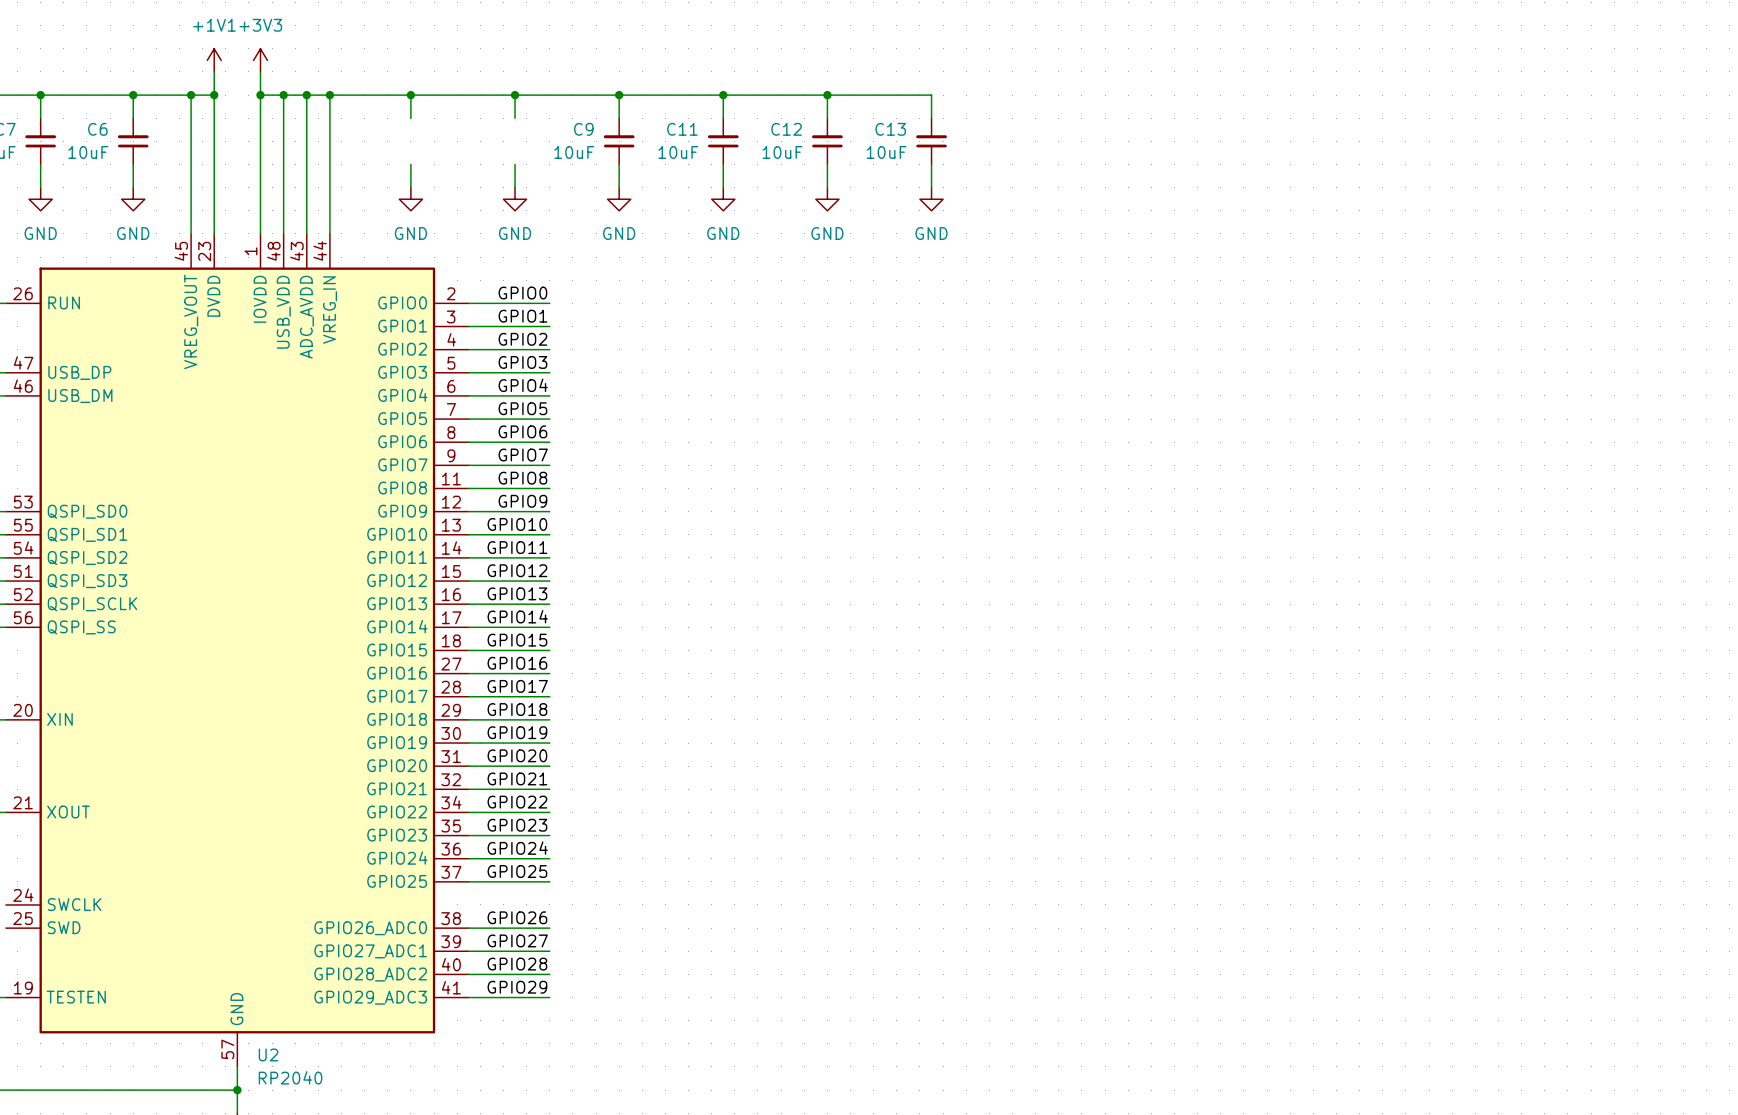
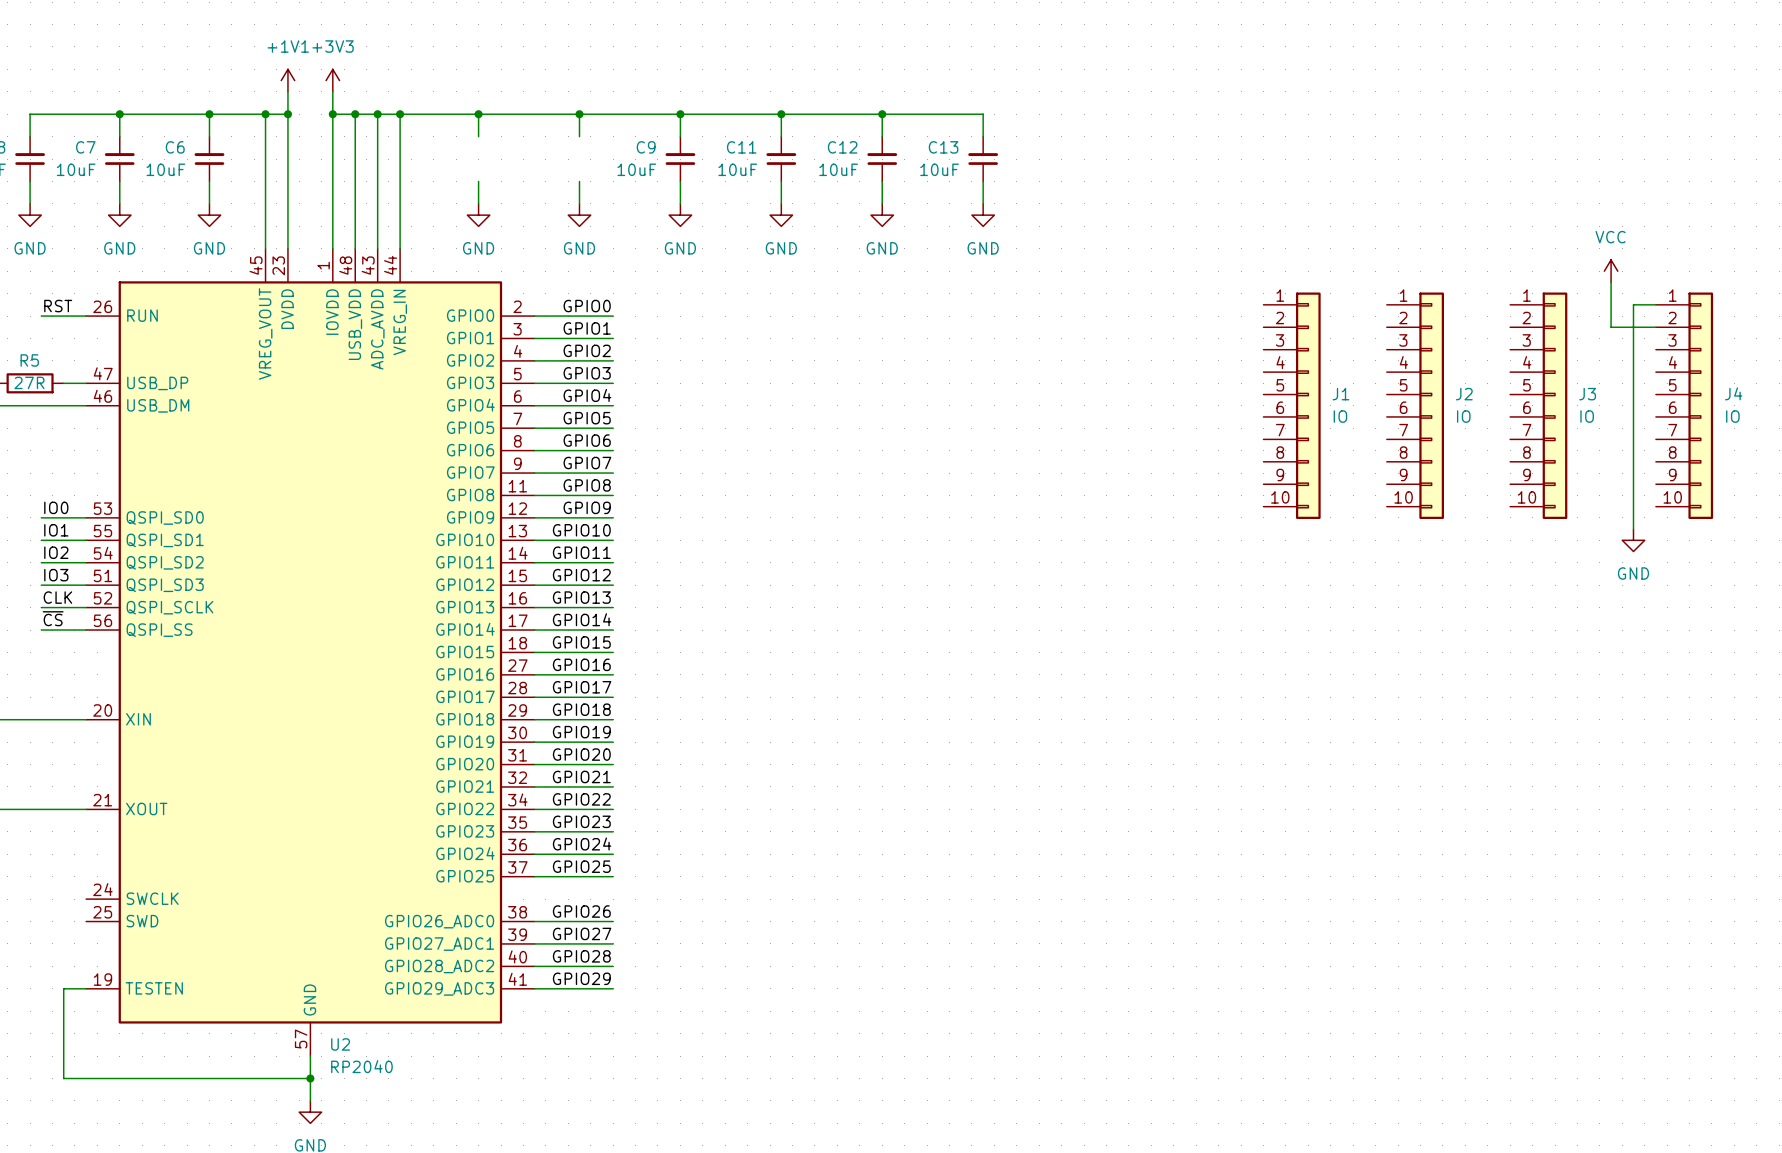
power symbol: none -> VCC (1611, 271)
wire: none -> (1611, 282) (1611, 327) (1655, 327)
wire: none -> (1655, 304) (1633, 304) (1633, 529)
J1: none -> IO (1292, 405)
J2: none -> IO (1415, 405)
J3: none -> IO (1538, 405)
J4: none -> IO (1684, 405)
power symbol: none -> GND (1633, 540)

